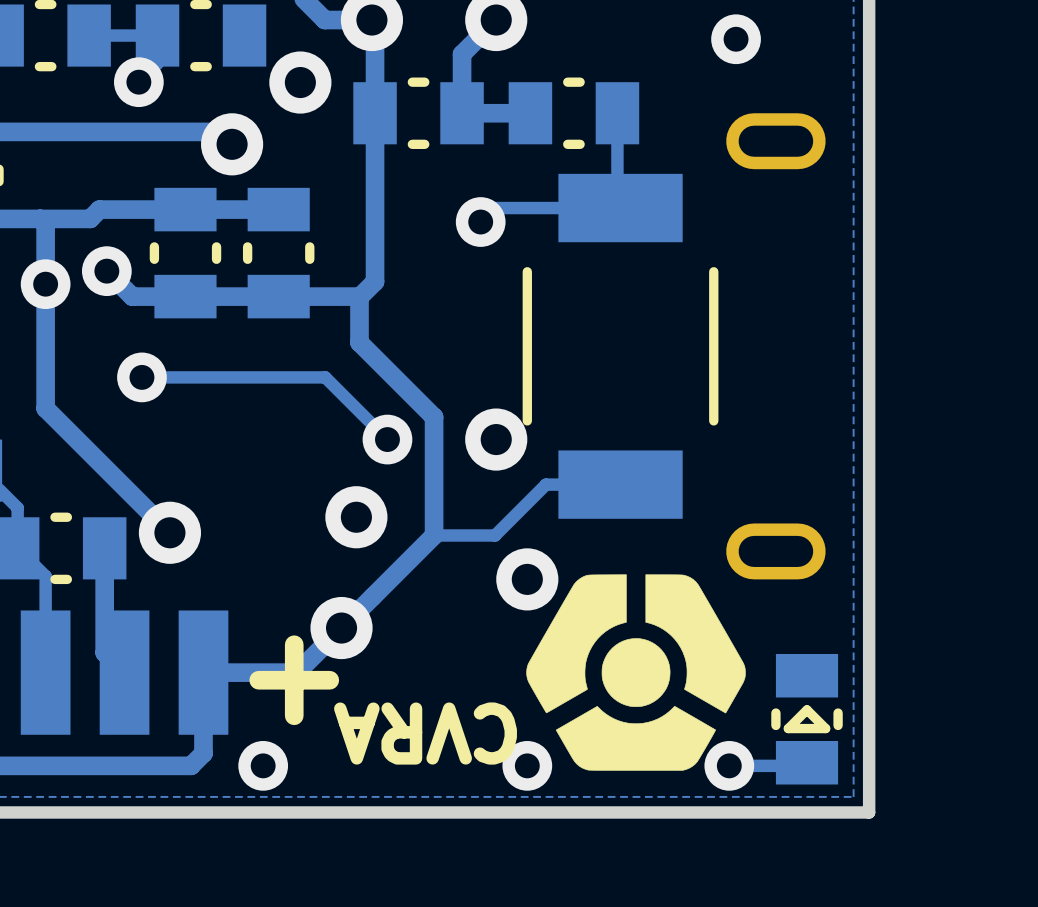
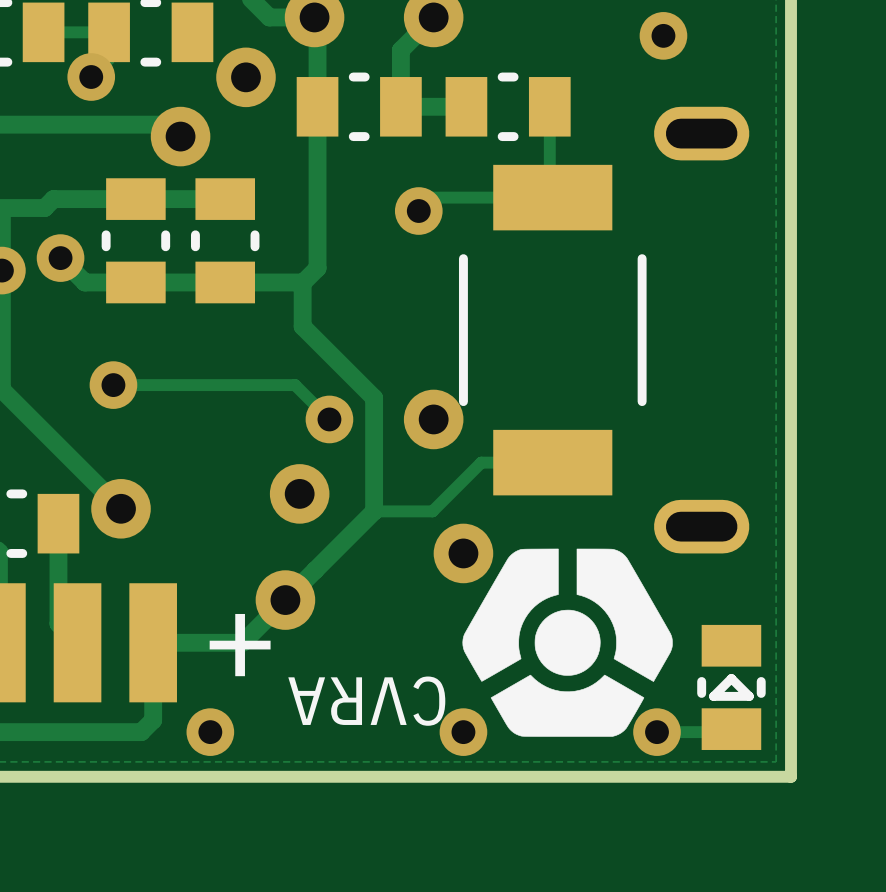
track: (141, 377) (325, 377) (351, 403) -> (113, 385) (295, 385)
via position: (141, 377) -> (113, 385)

